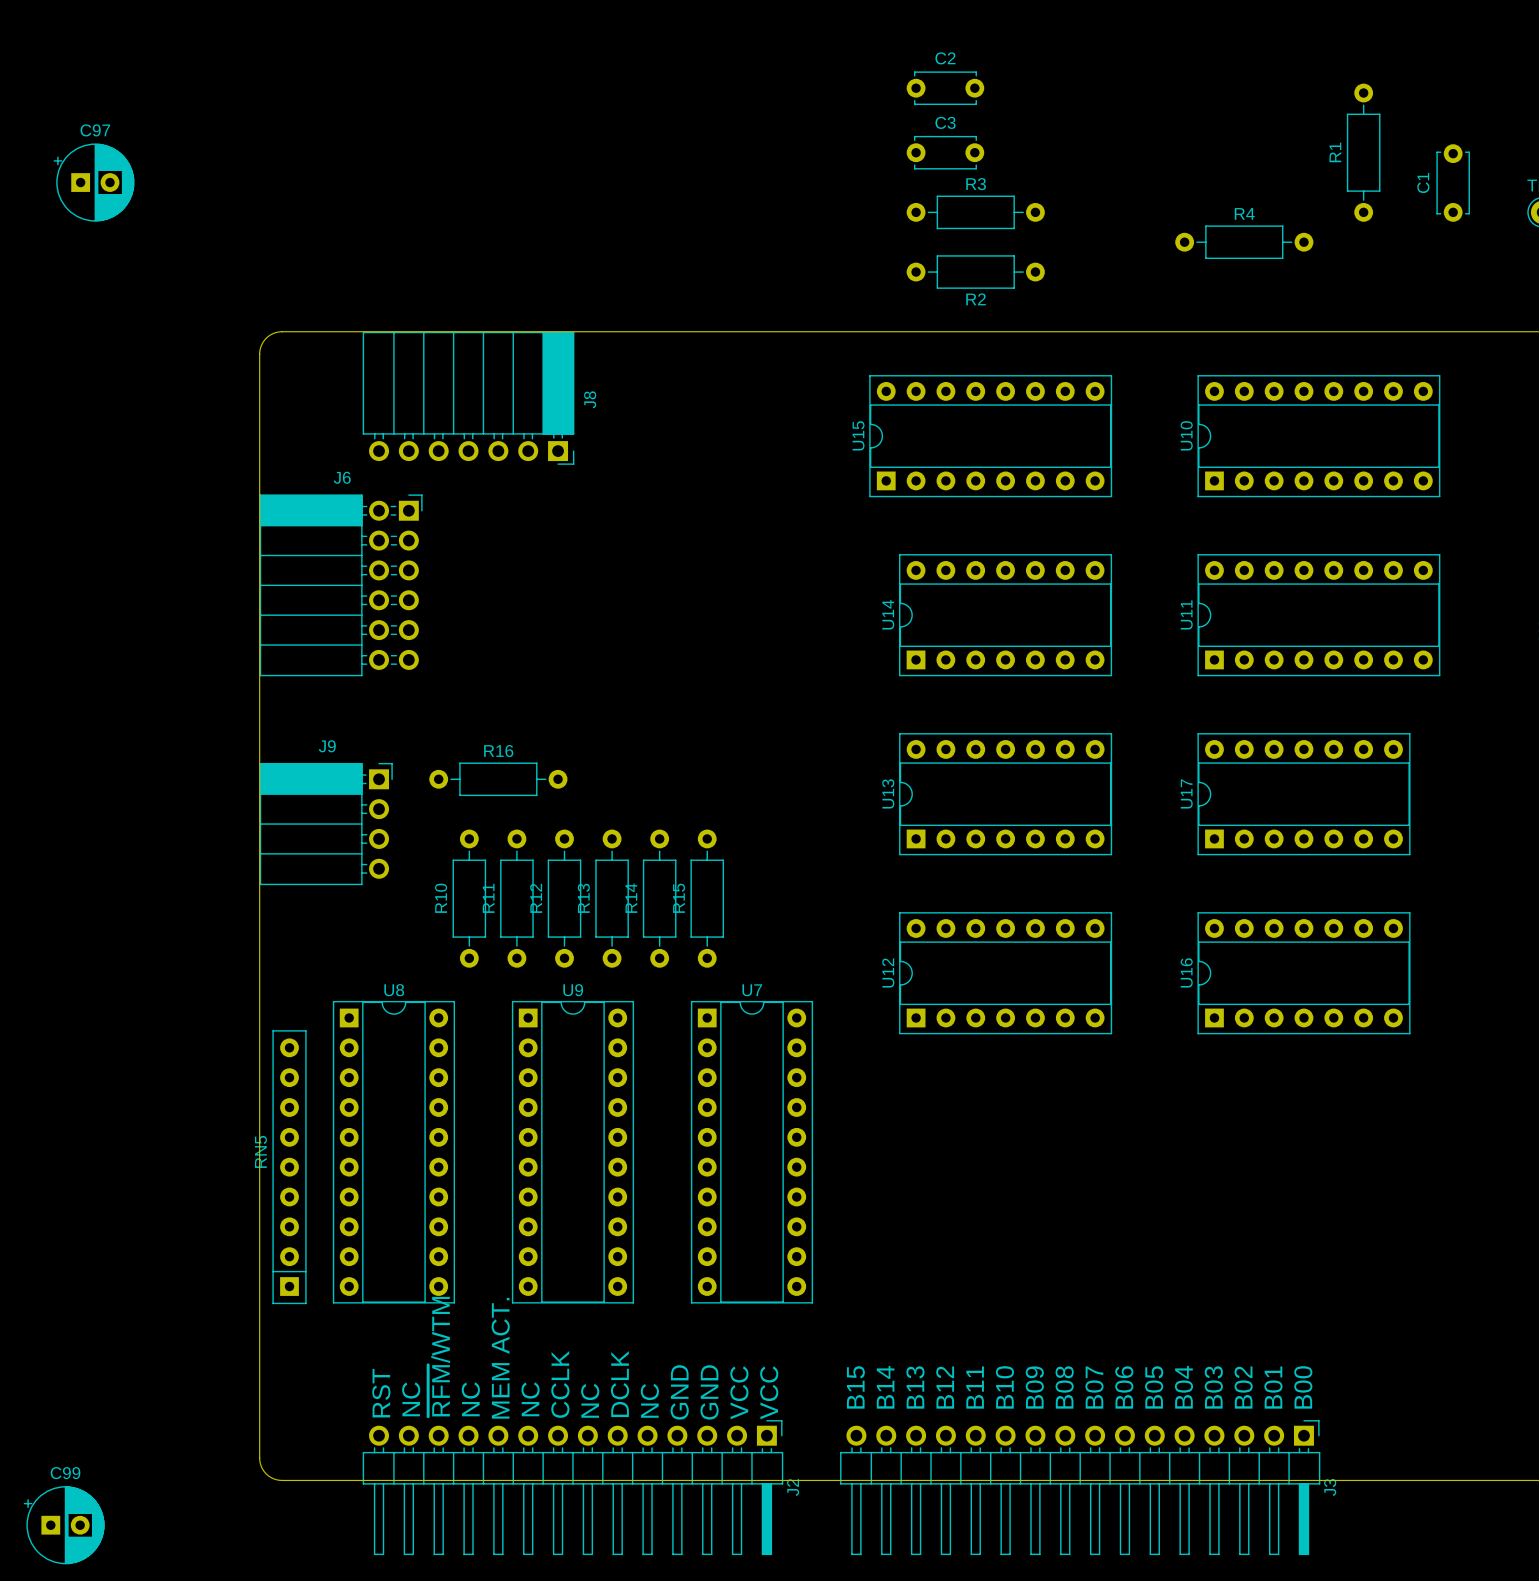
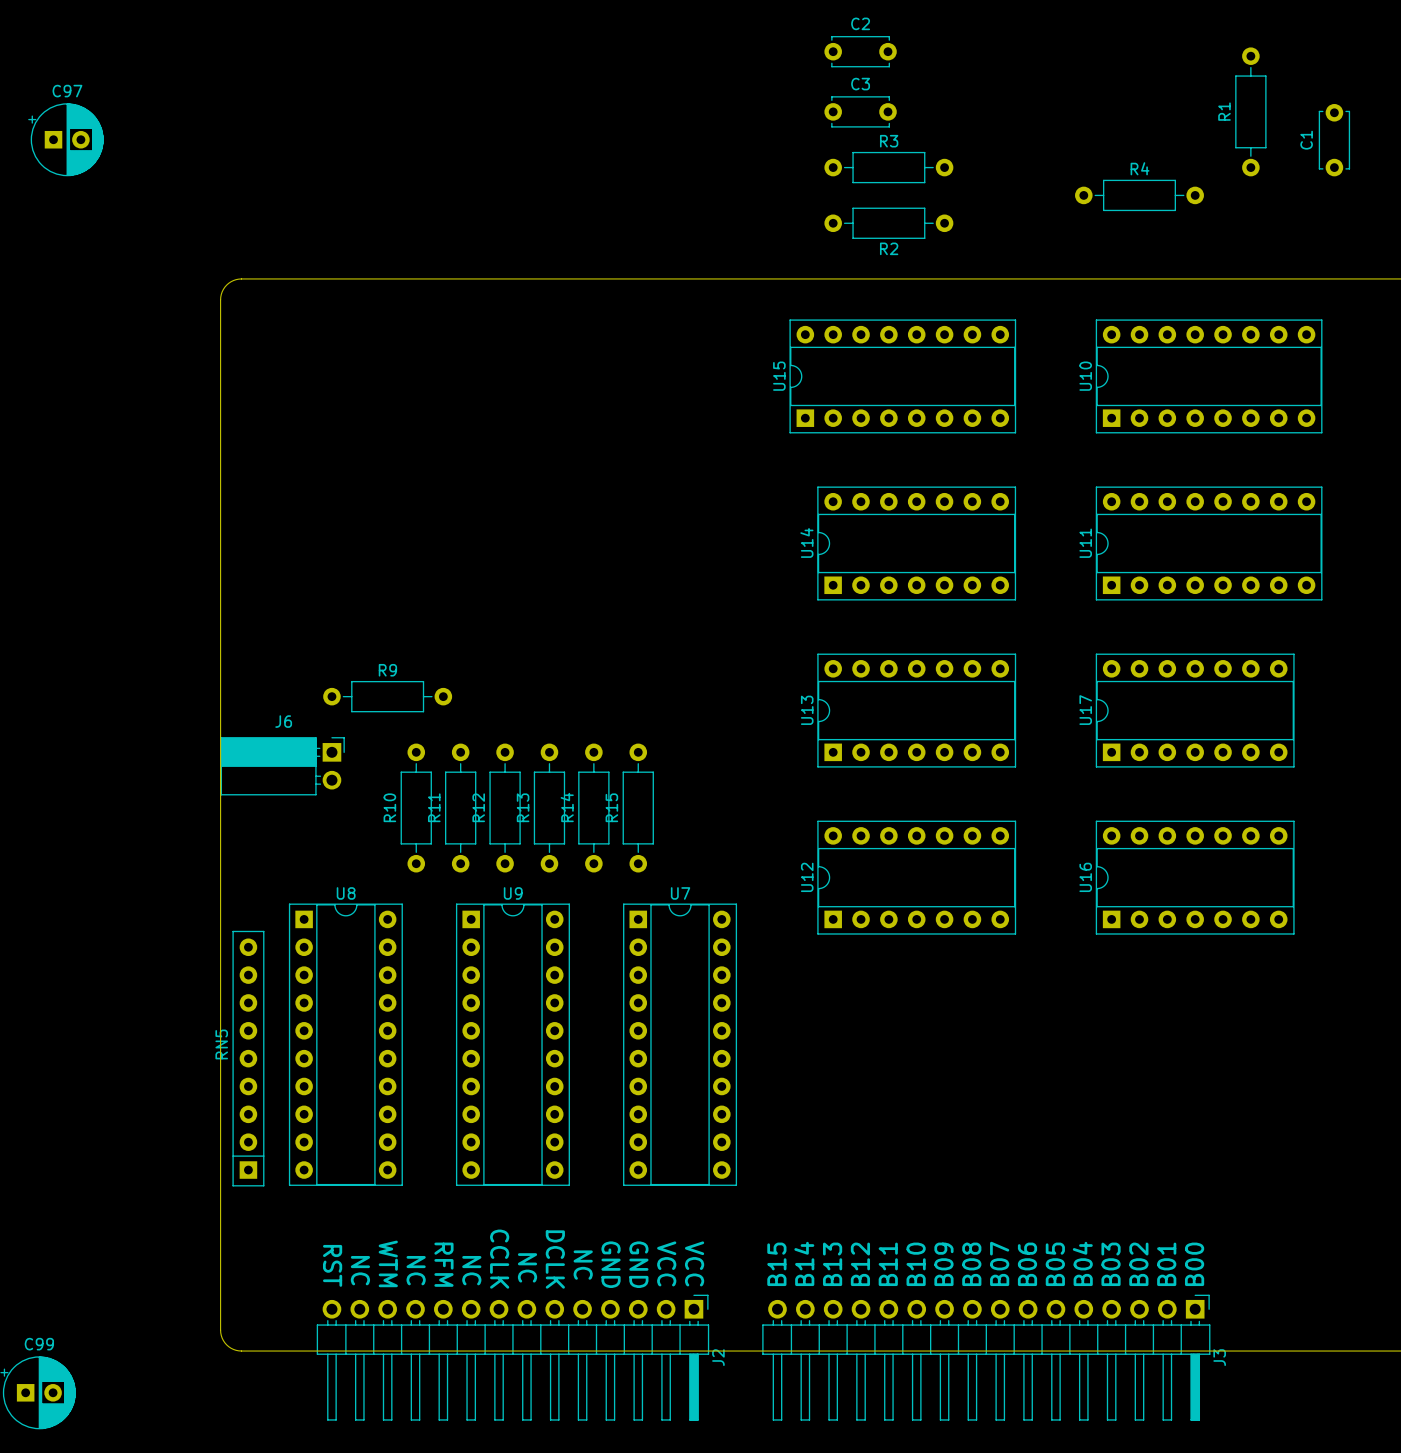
J8: (468, 398) -> none
J6 name position: J6 (342, 477) -> J6 (283, 721)
J6 footprint: [259, 494, 423, 677] -> [220, 737, 345, 796]
R9: none -> (387, 696)
R16: (498, 779) -> none
J9: (326, 824) -> none
J2 footprint: [362, 1420, 784, 1556] -> [316, 1294, 710, 1421]

